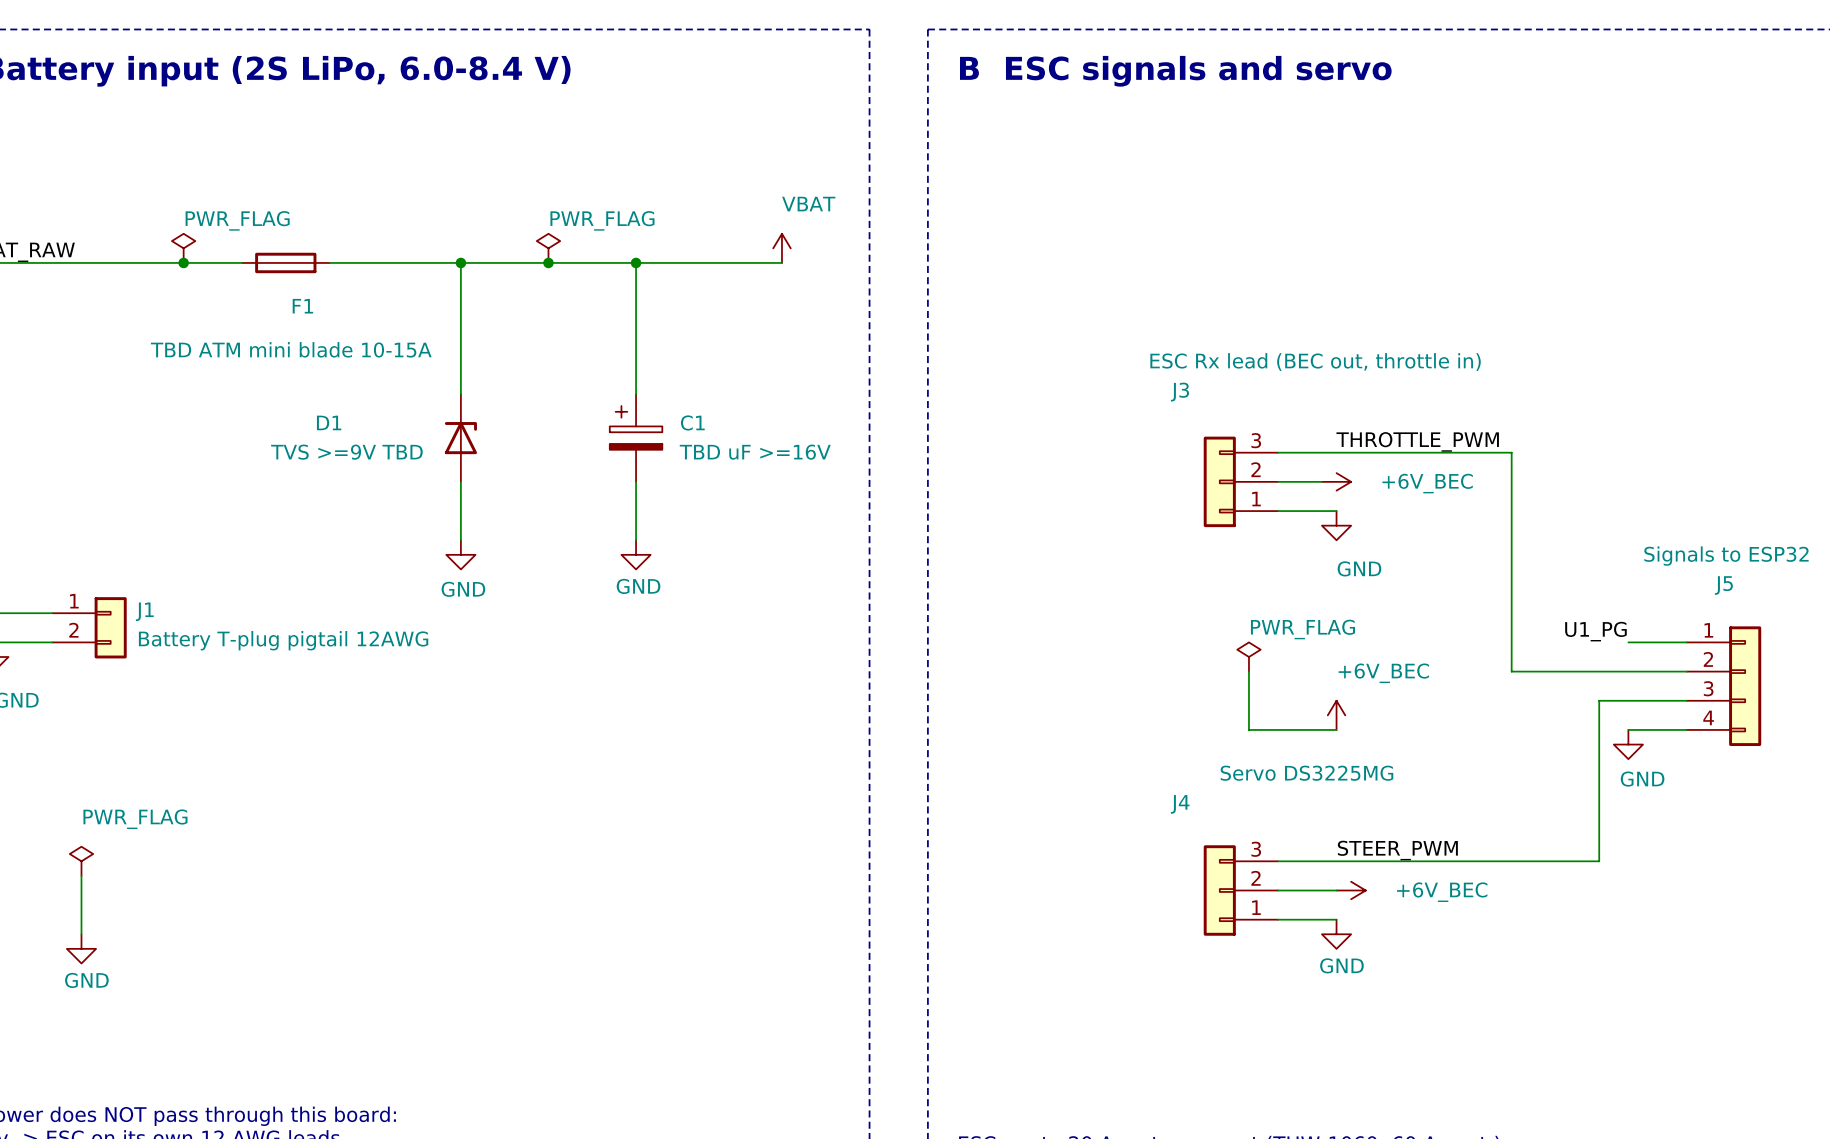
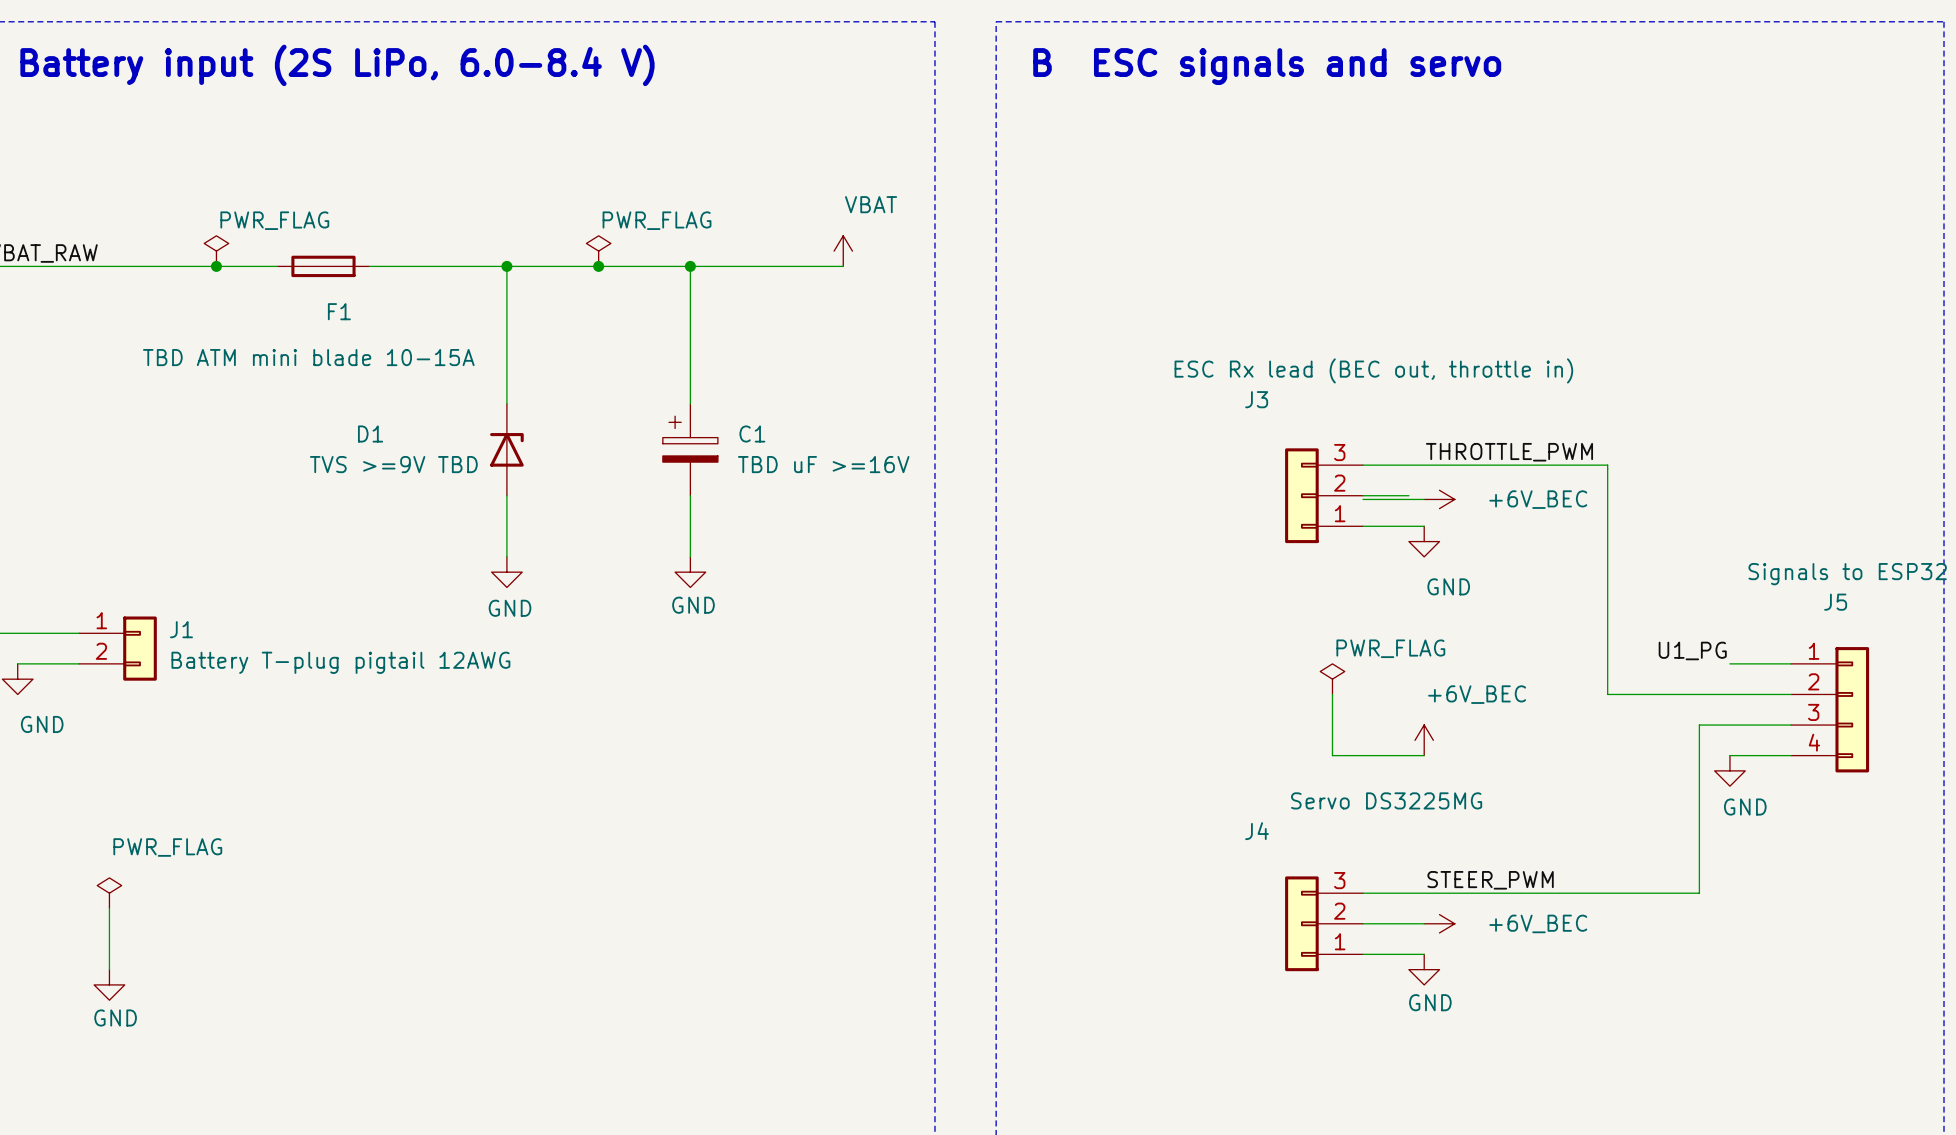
power symbol position: +6V_BEC (1336, 481) -> +6V_BEC (1439, 499)
wire: none -> (1363, 499) (1424, 499)

